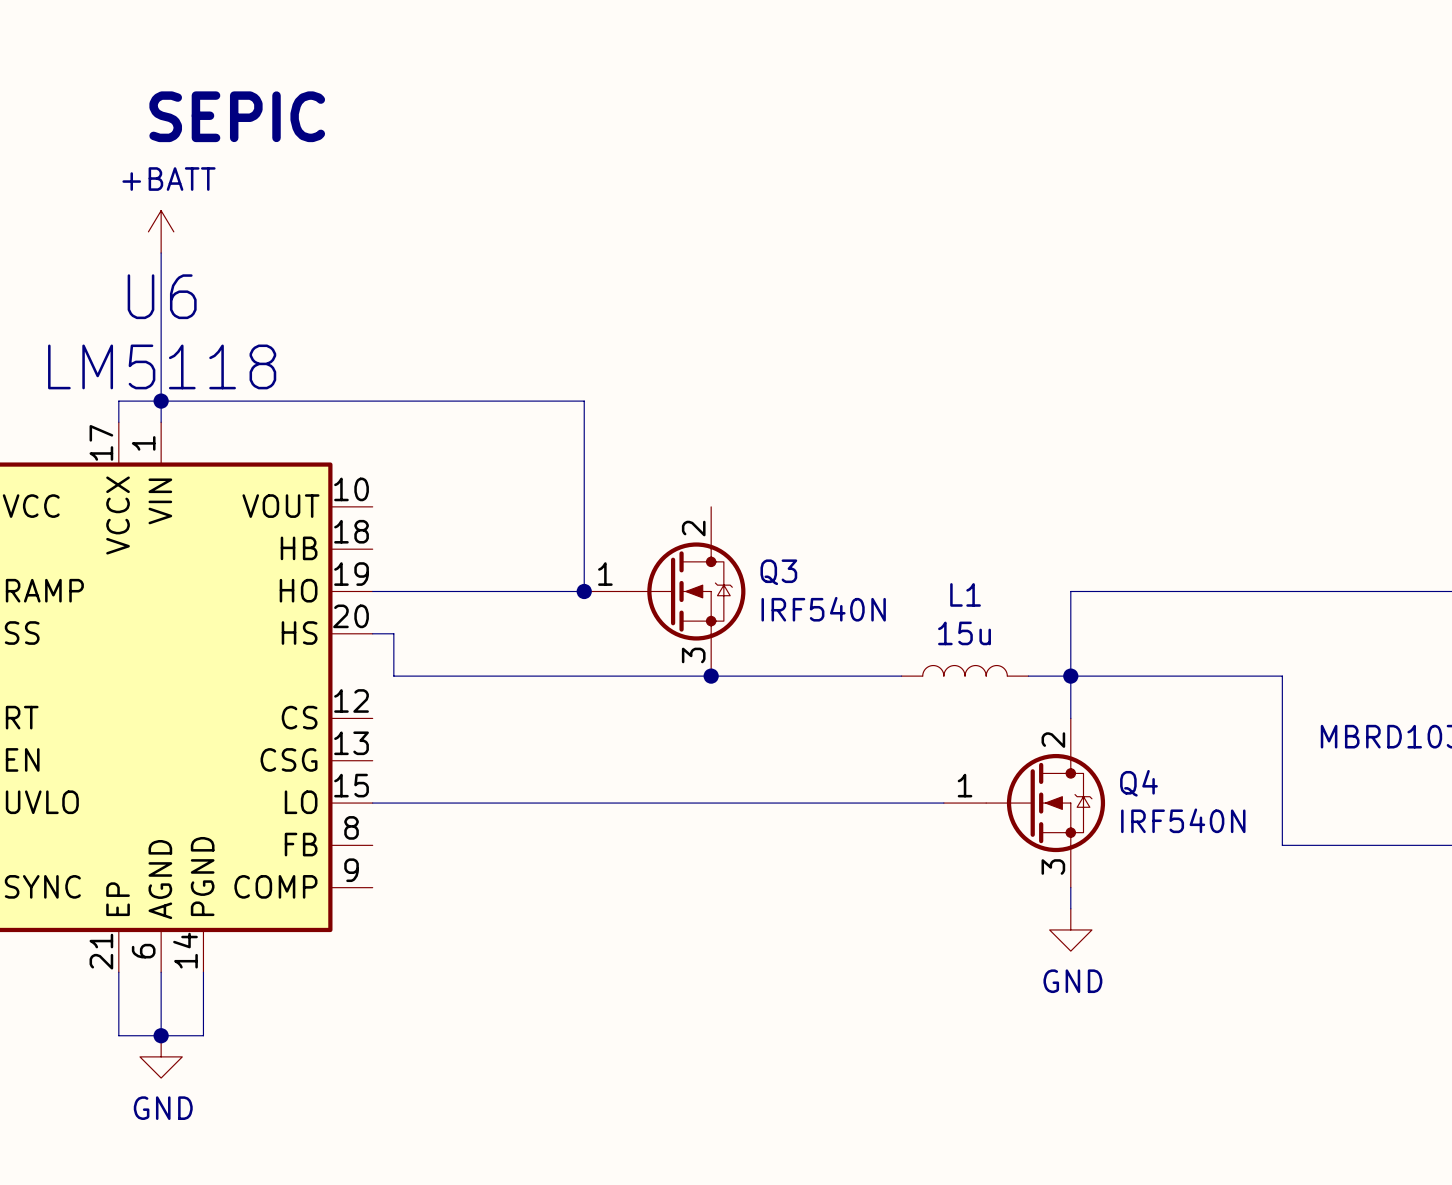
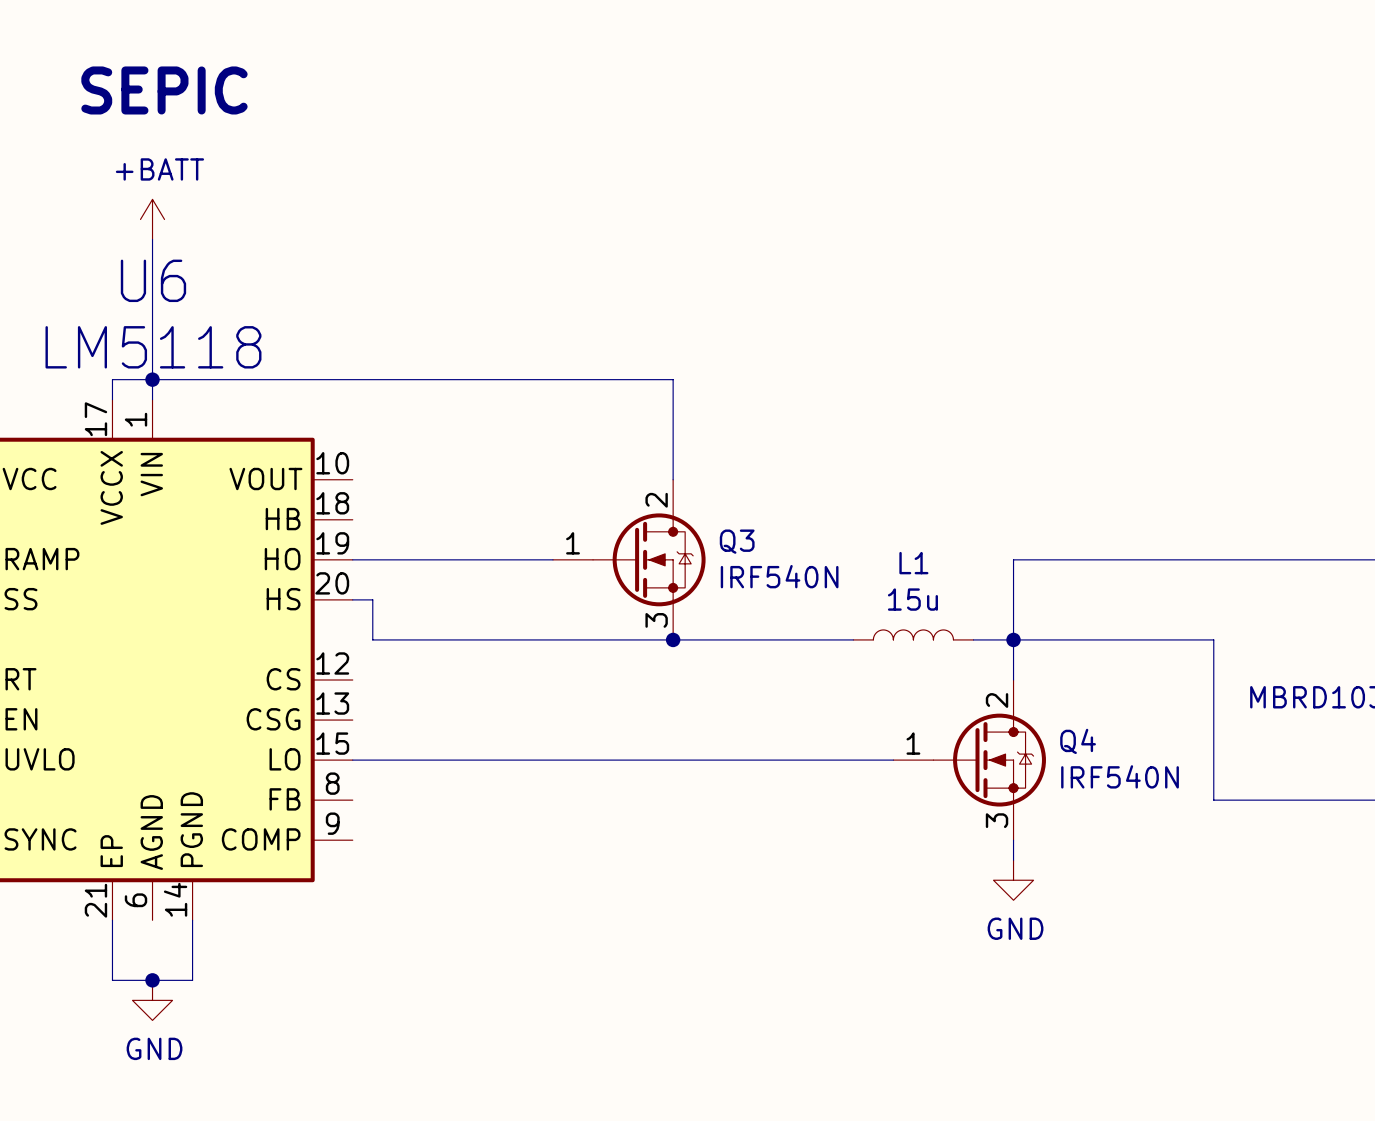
text position: SEPIC (237, 116) -> SEPIC (164, 90)
wire: (584, 401) (584, 591) -> (552, 379) (673, 379) (673, 479)
junction: (584, 591) -> none
wire: (161, 972) (161, 1035) -> none

